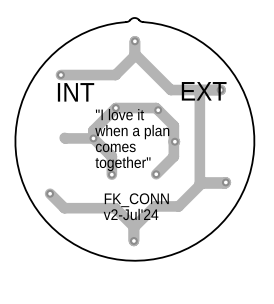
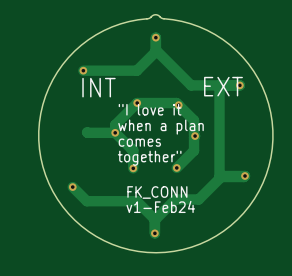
text: v2-Jul'24 (131, 214) -> v1-Feb24 (160, 206)

